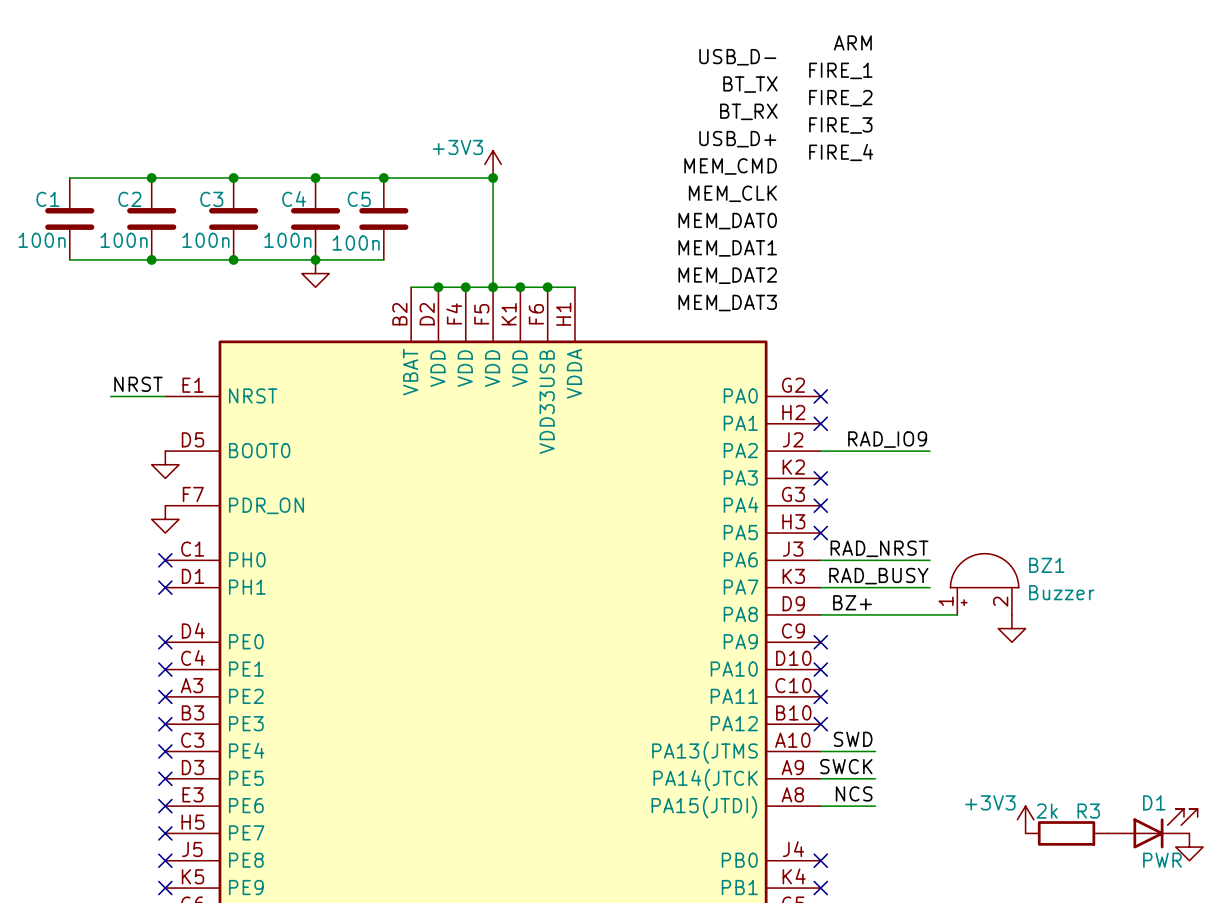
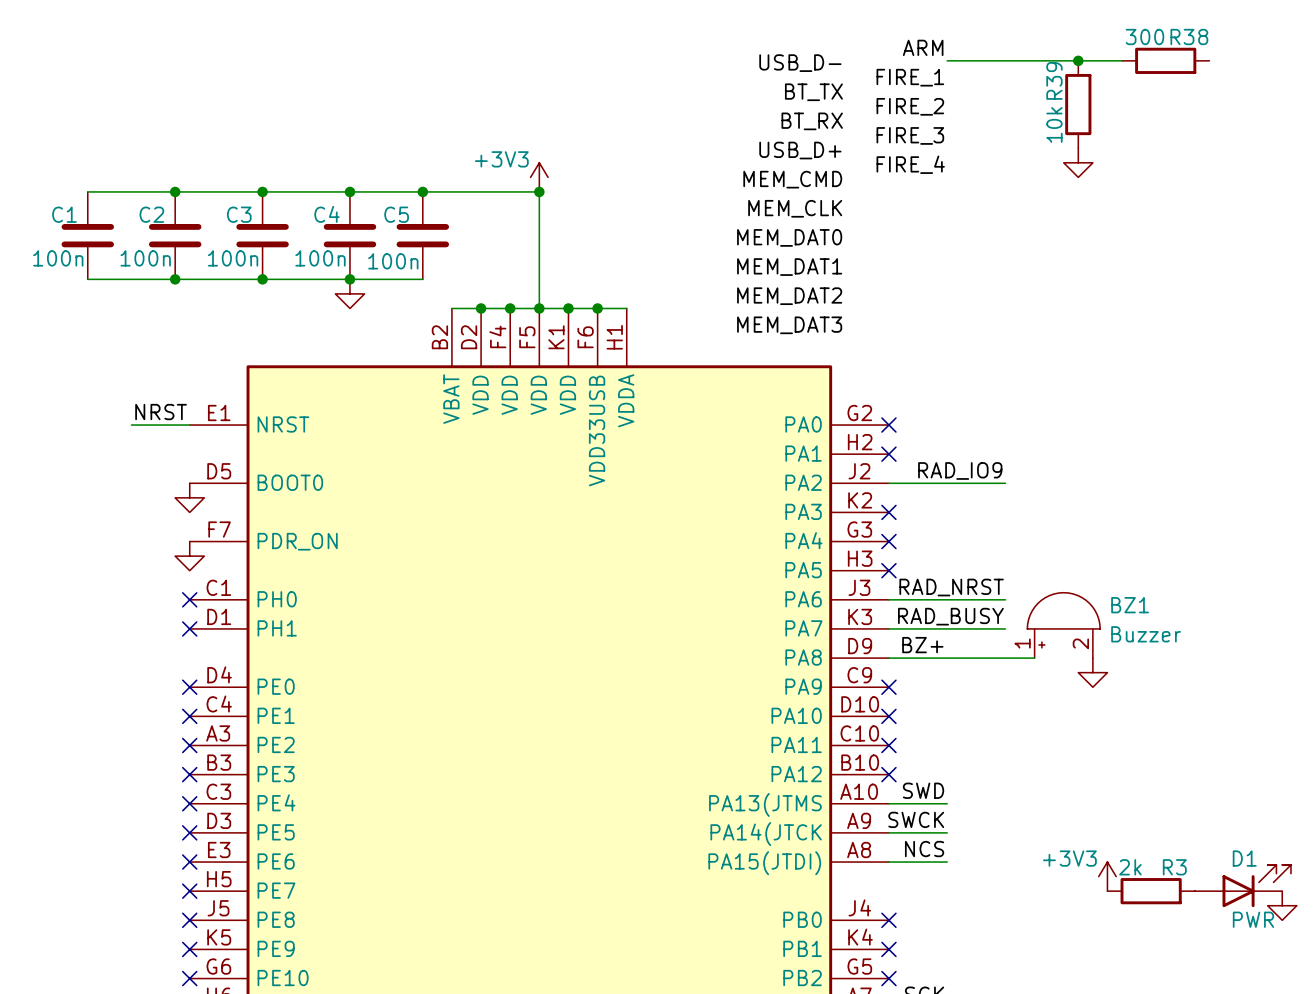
wire: none -> (947, 60) (1122, 60)
junction: none -> (1078, 60)
R38: none -> 300 (1165, 60)
R39: none -> 10k (1078, 104)
power symbol: none -> (1078, 162)

